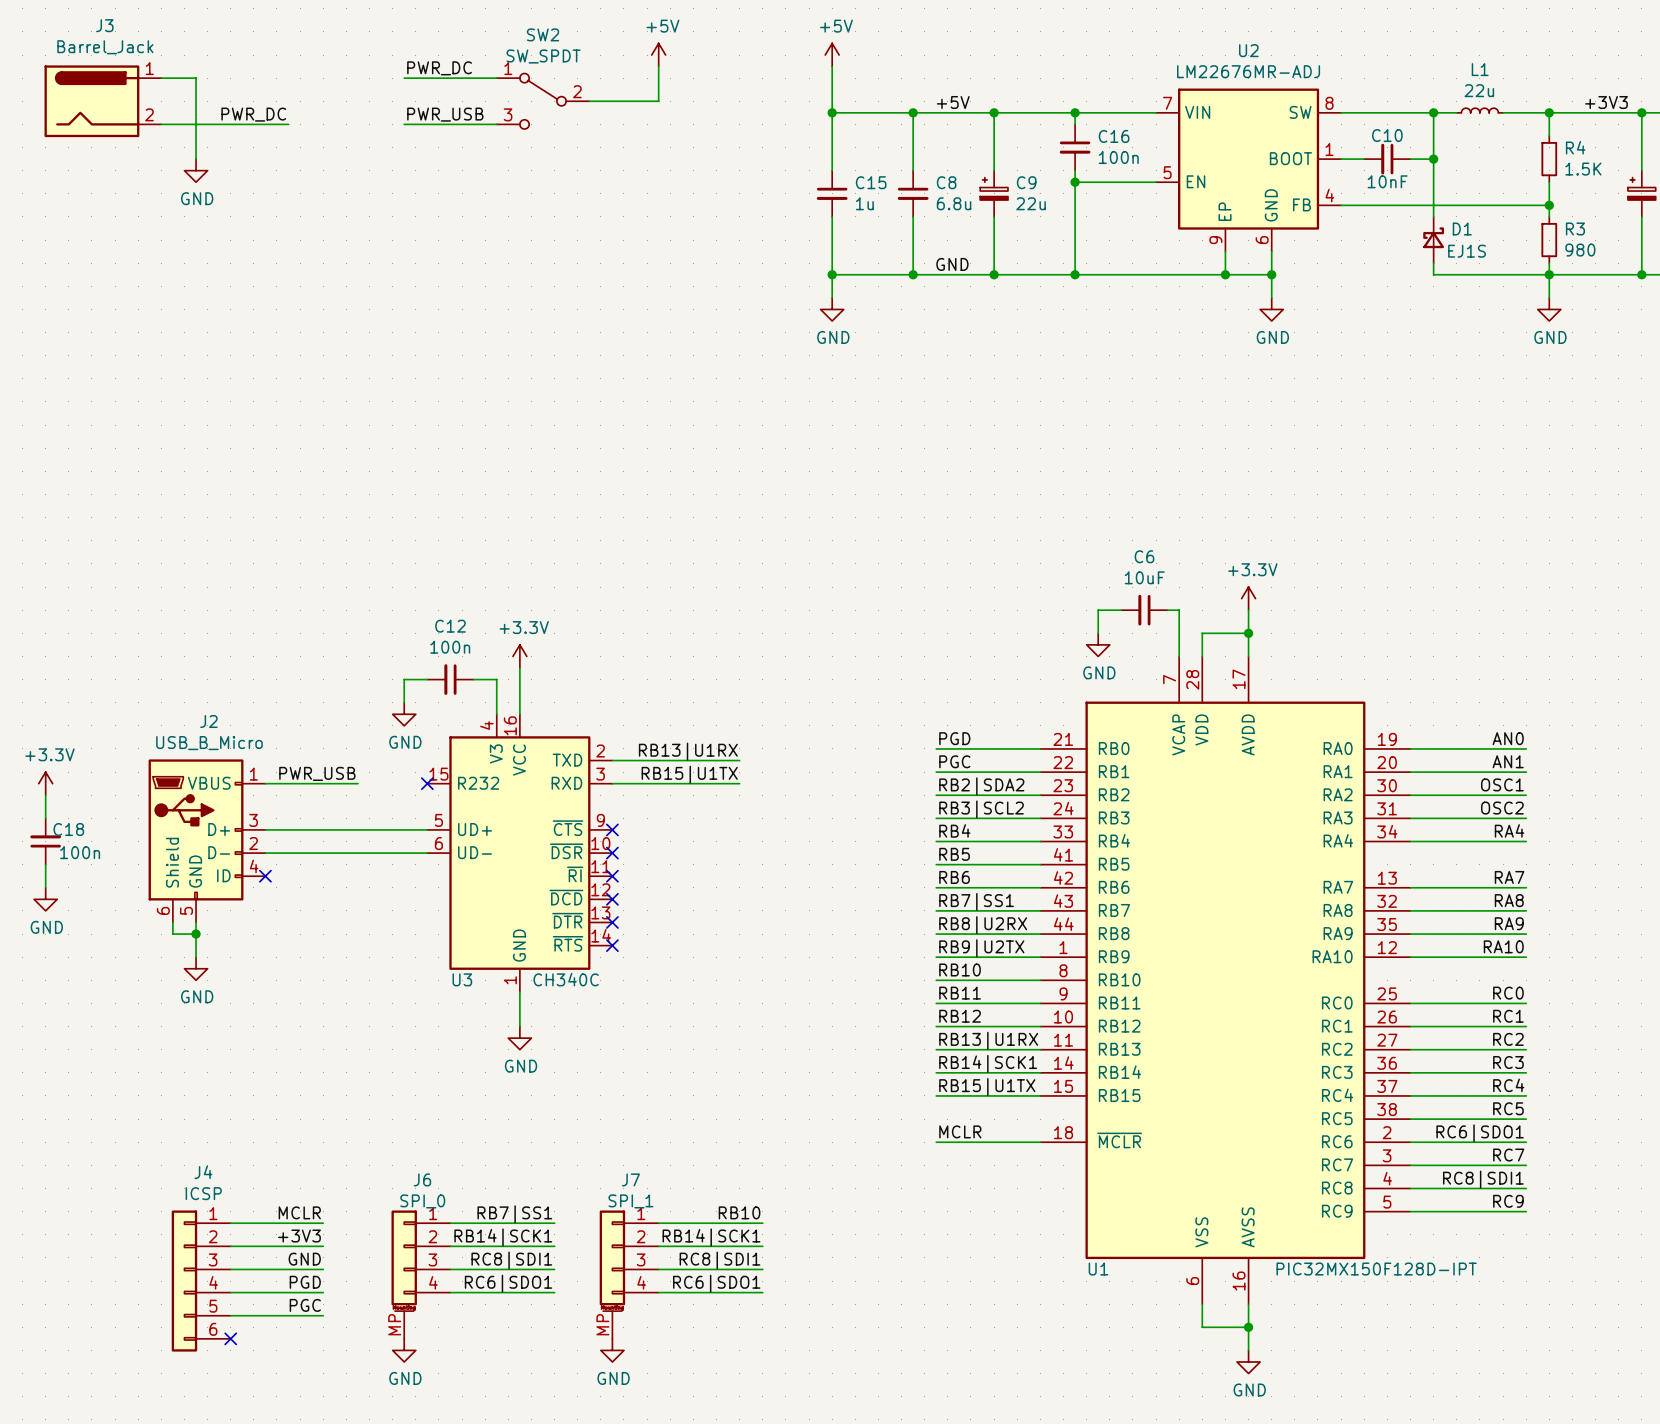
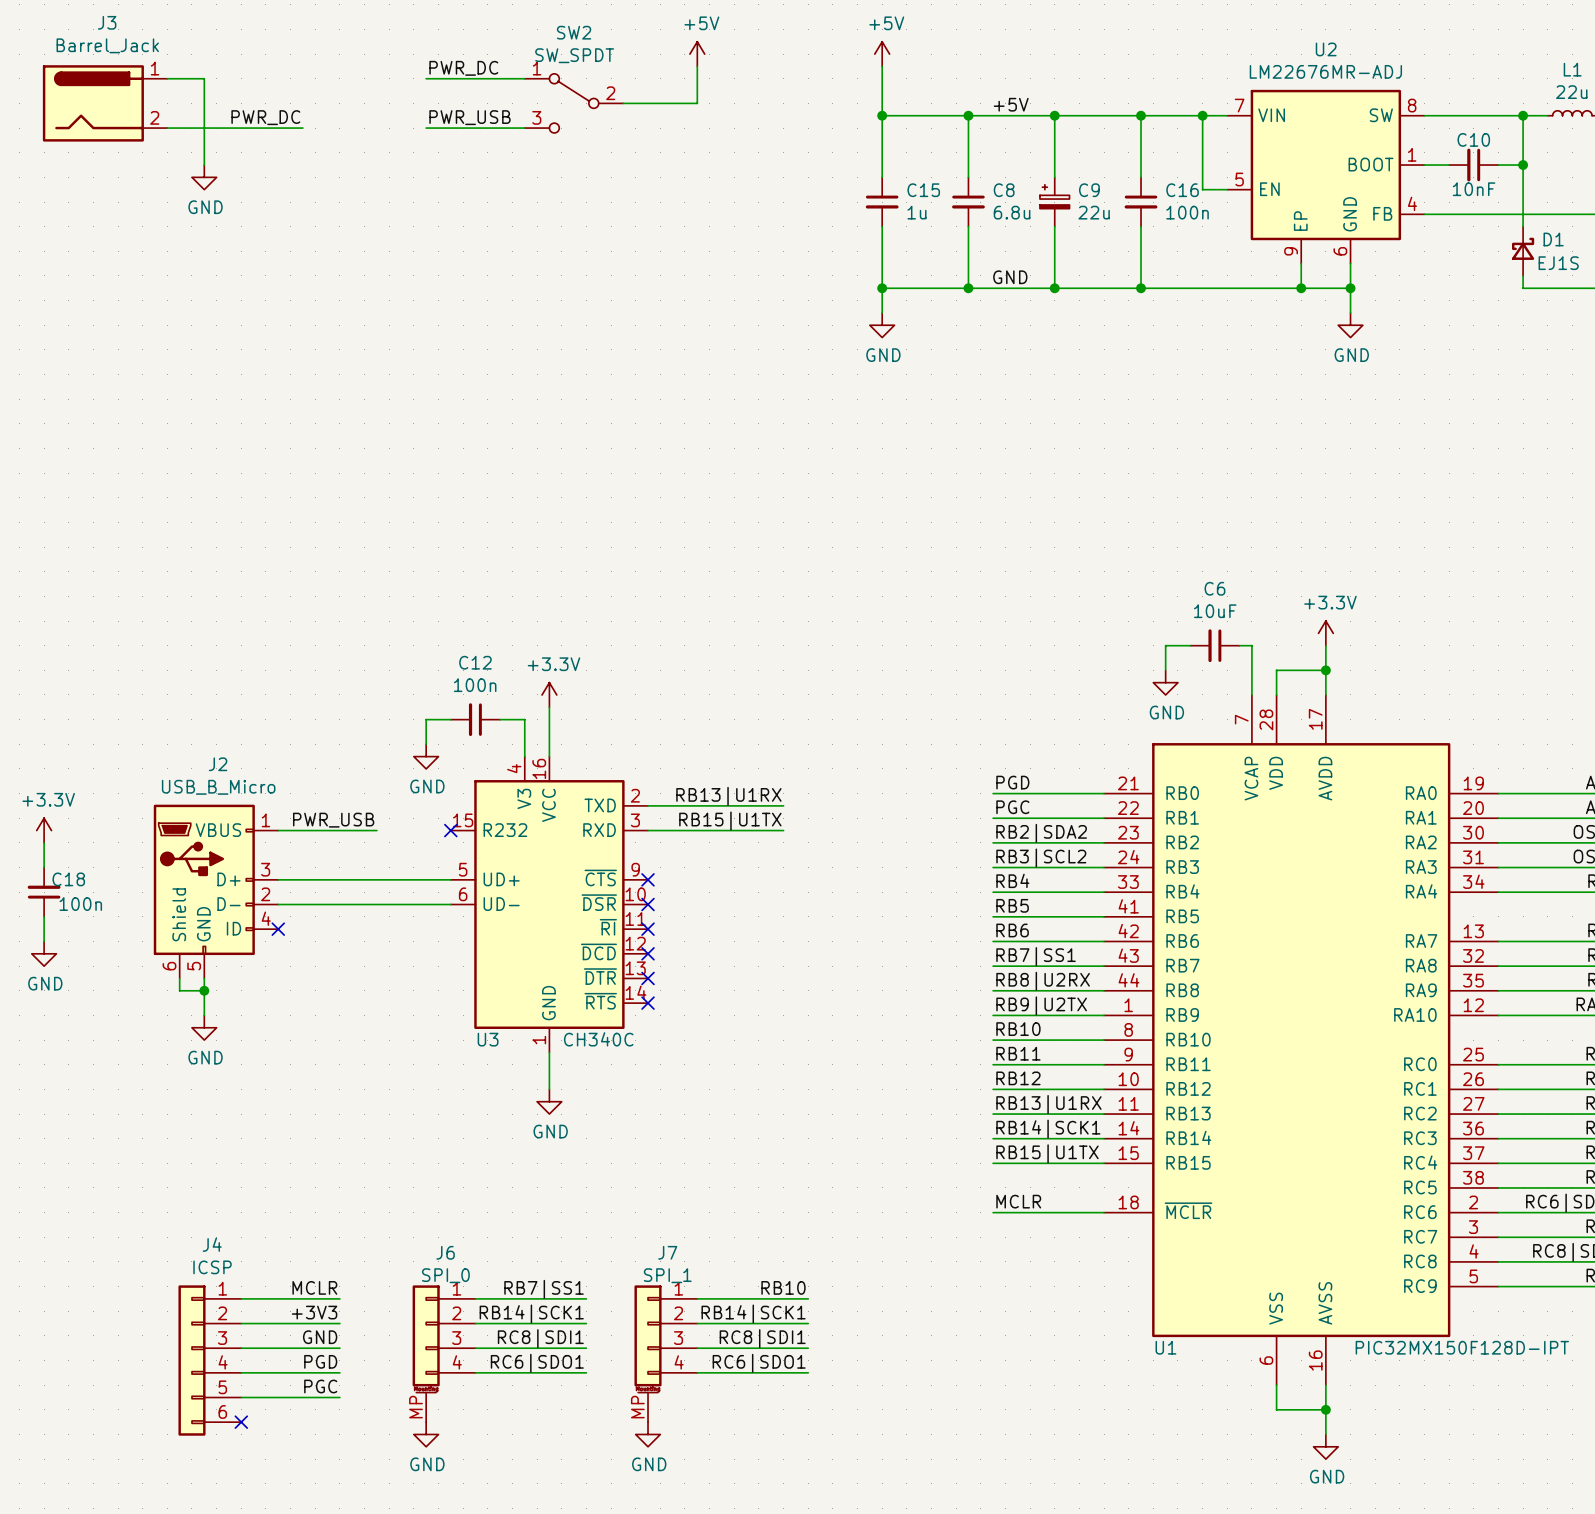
junction: none -> (1202, 115)
C16 position: (1075, 147) -> (1141, 202)
wire: (1075, 182) (1132, 182) -> (1202, 115) (1202, 189)
junction: (1075, 182) -> none

